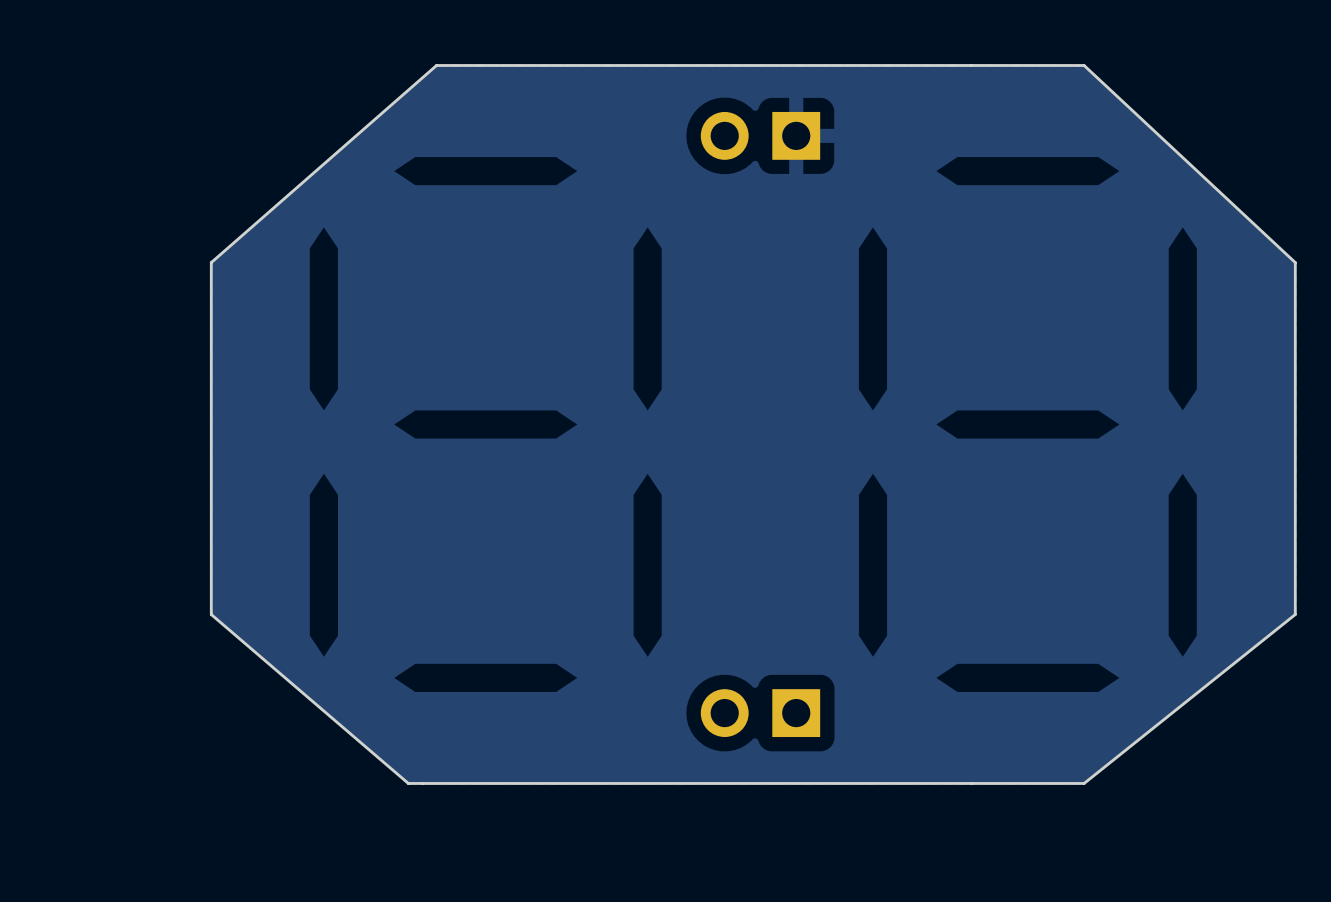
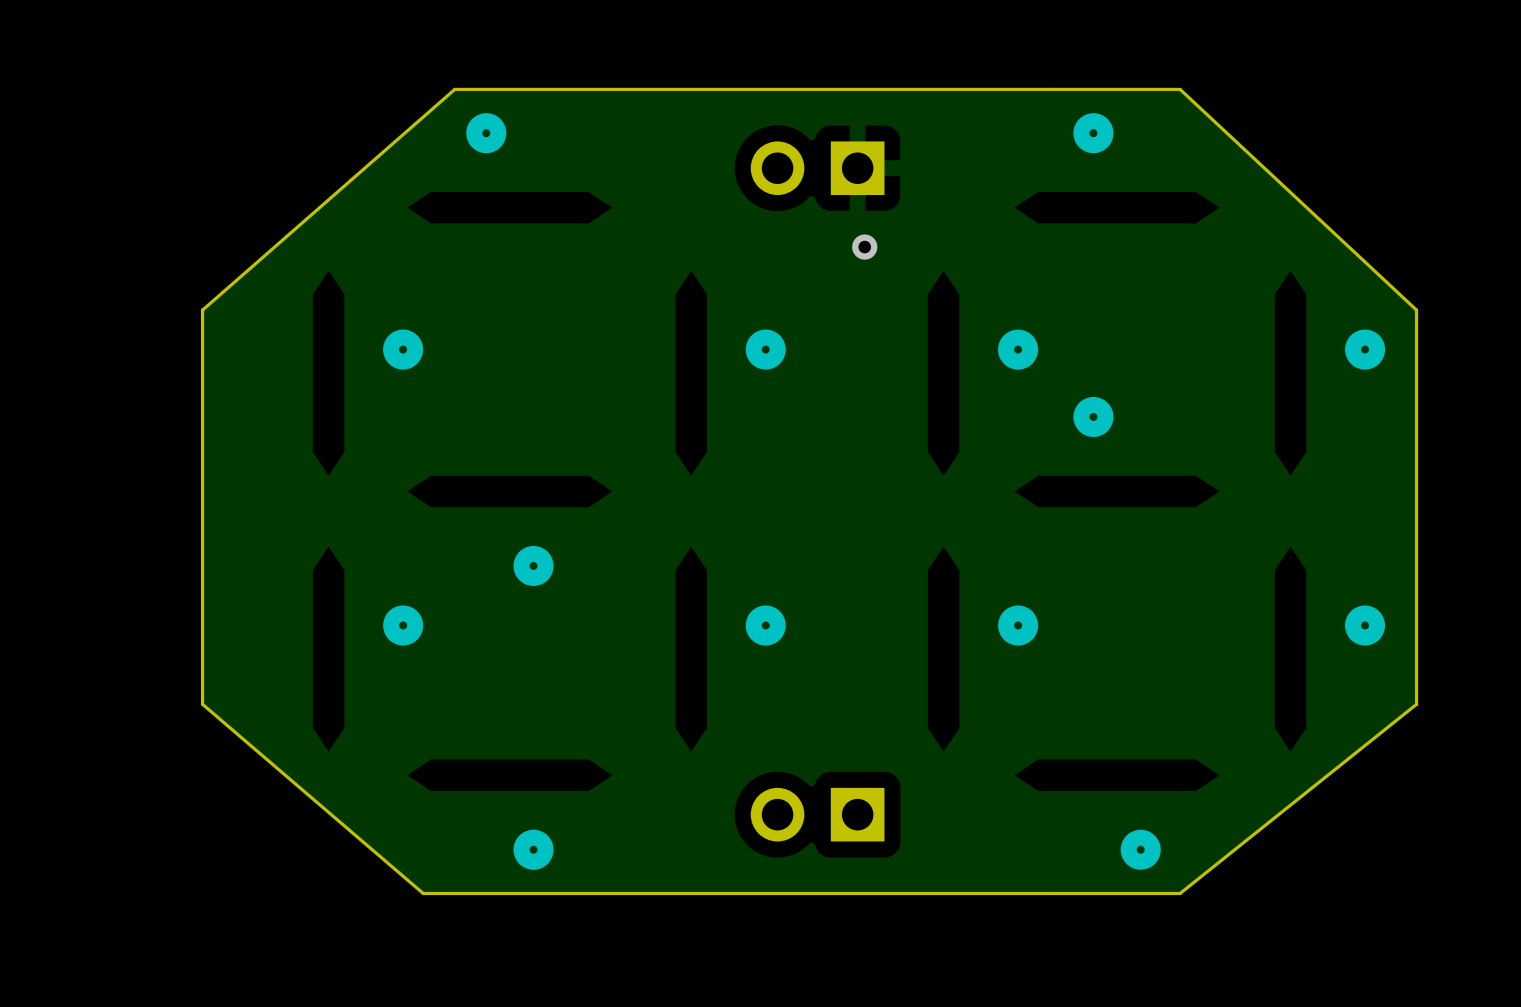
part: none -> (486, 133)
part: none -> (1093, 133)
via: none -> (864, 247)
part: none -> (403, 349)
part: none -> (765, 349)
part: none -> (1018, 349)
part: none -> (1365, 349)
part: none -> (1093, 416)
part: none -> (533, 565)
part: none -> (403, 625)
part: none -> (765, 625)
part: none -> (1018, 625)
part: none -> (1365, 625)
part: none -> (533, 849)
part: none -> (1140, 849)

